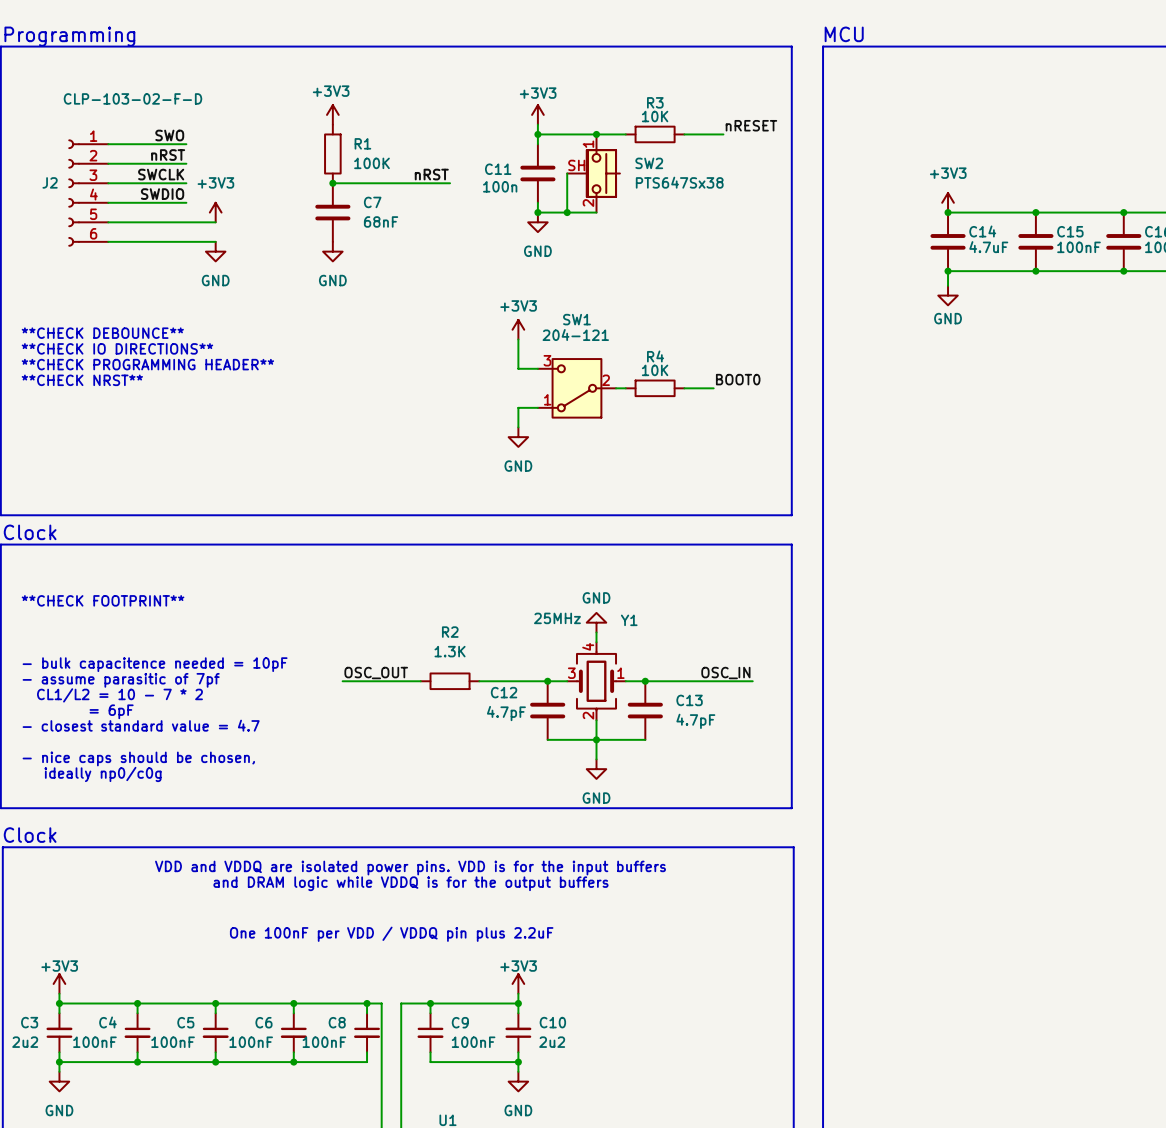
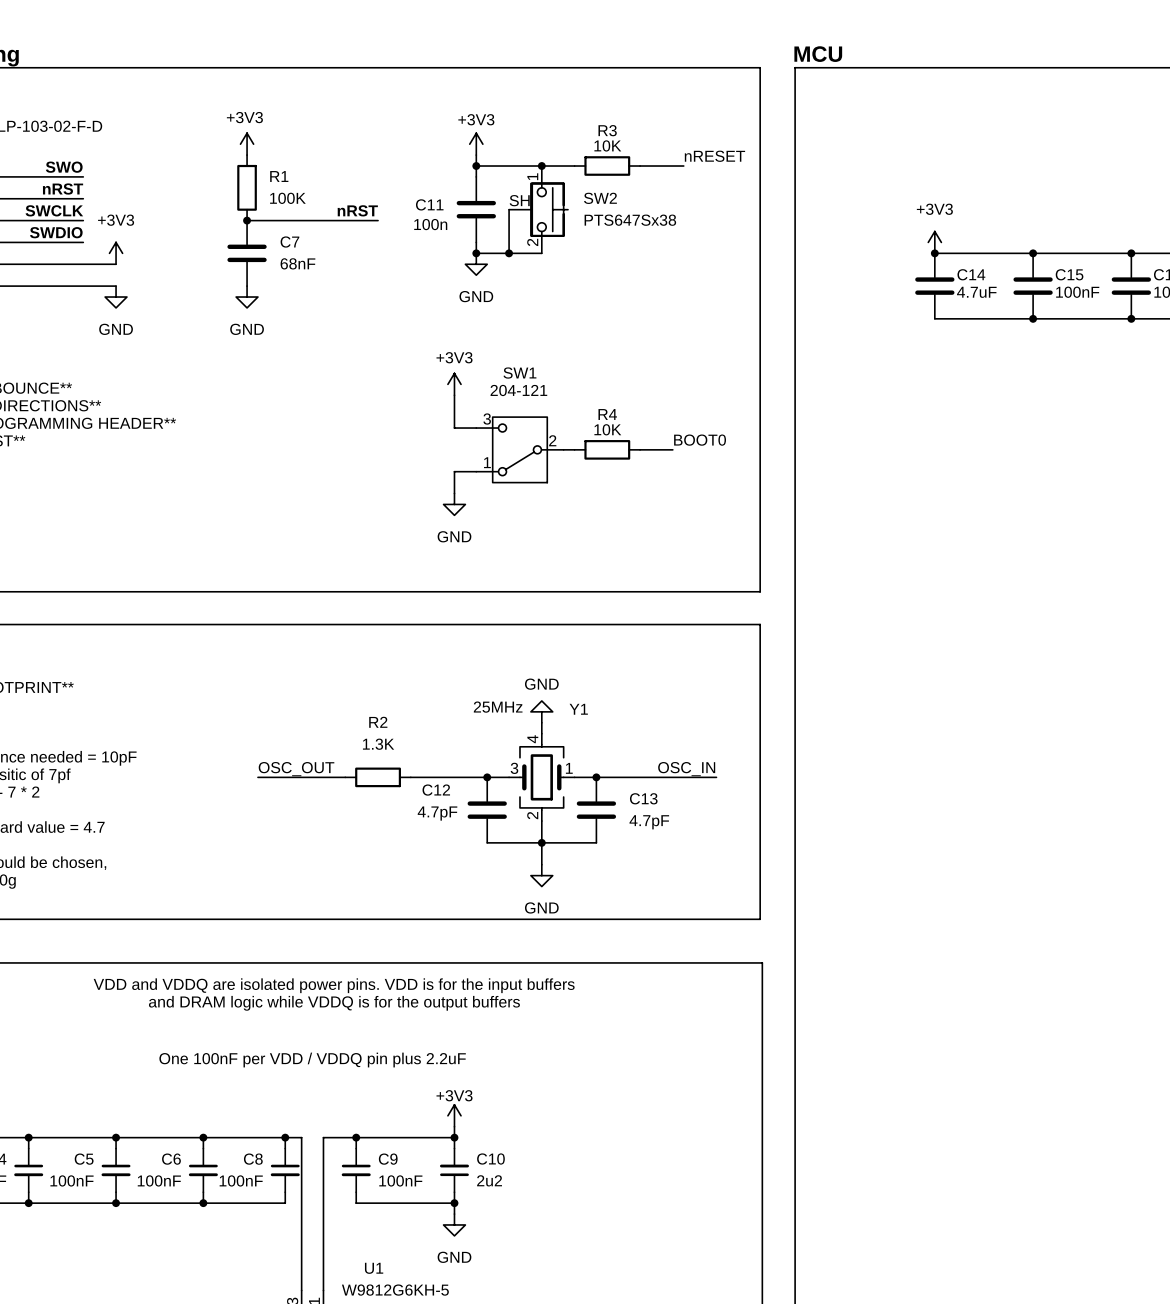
wire: (948, 271) (948, 285) -> none
junction: (948, 271) -> none
power symbol: GND (948, 295) -> none

